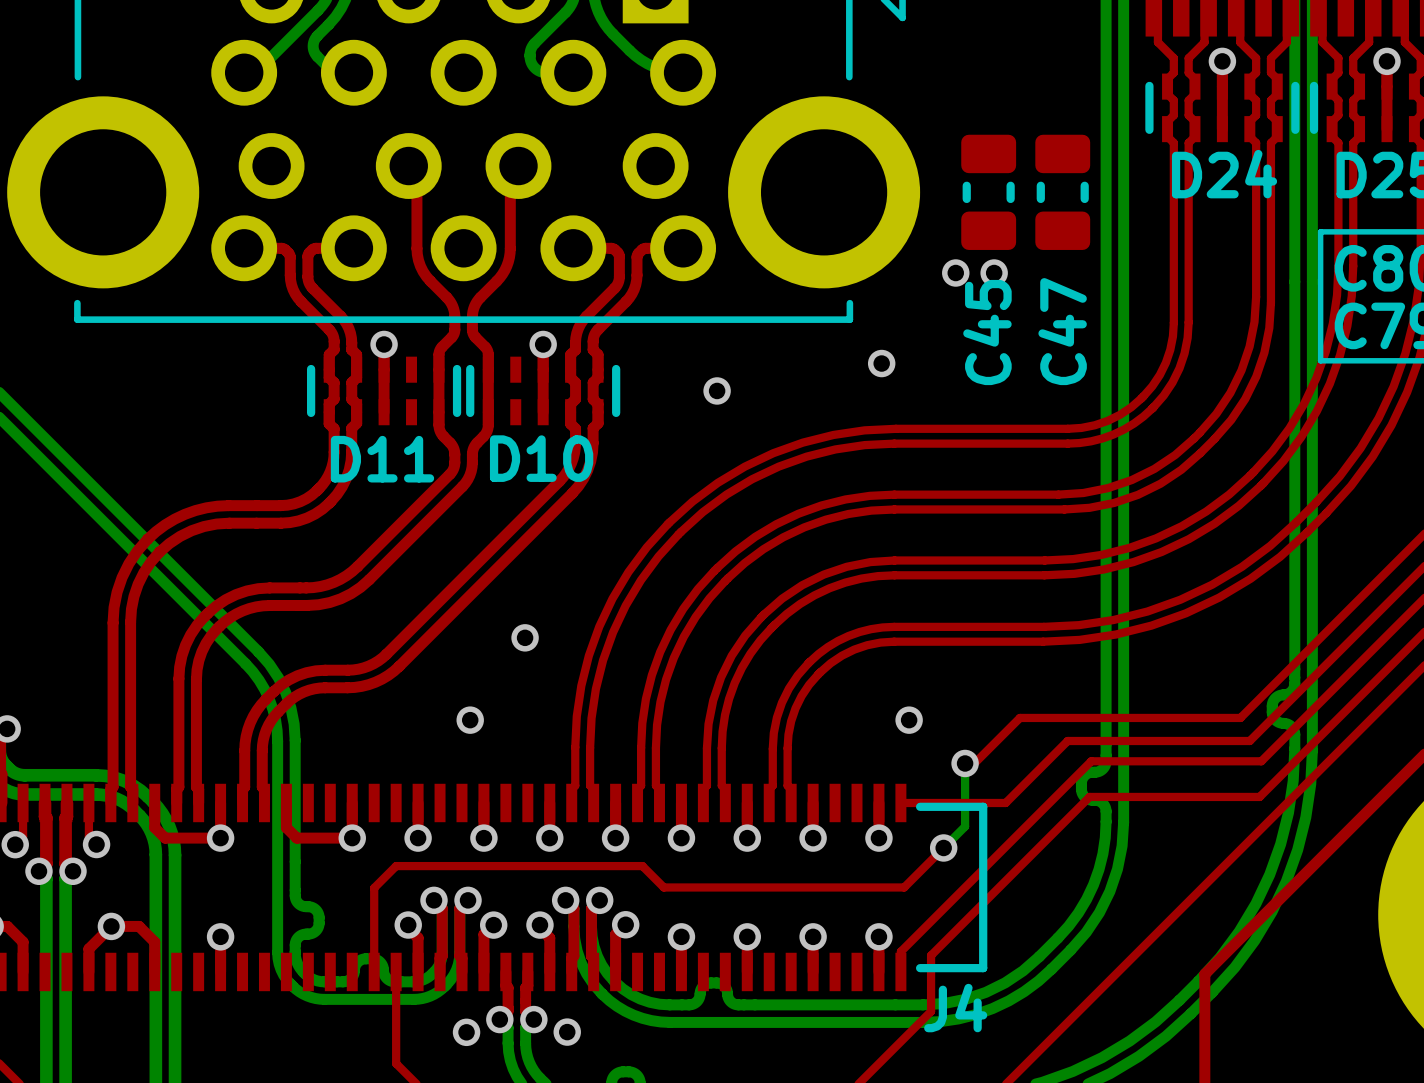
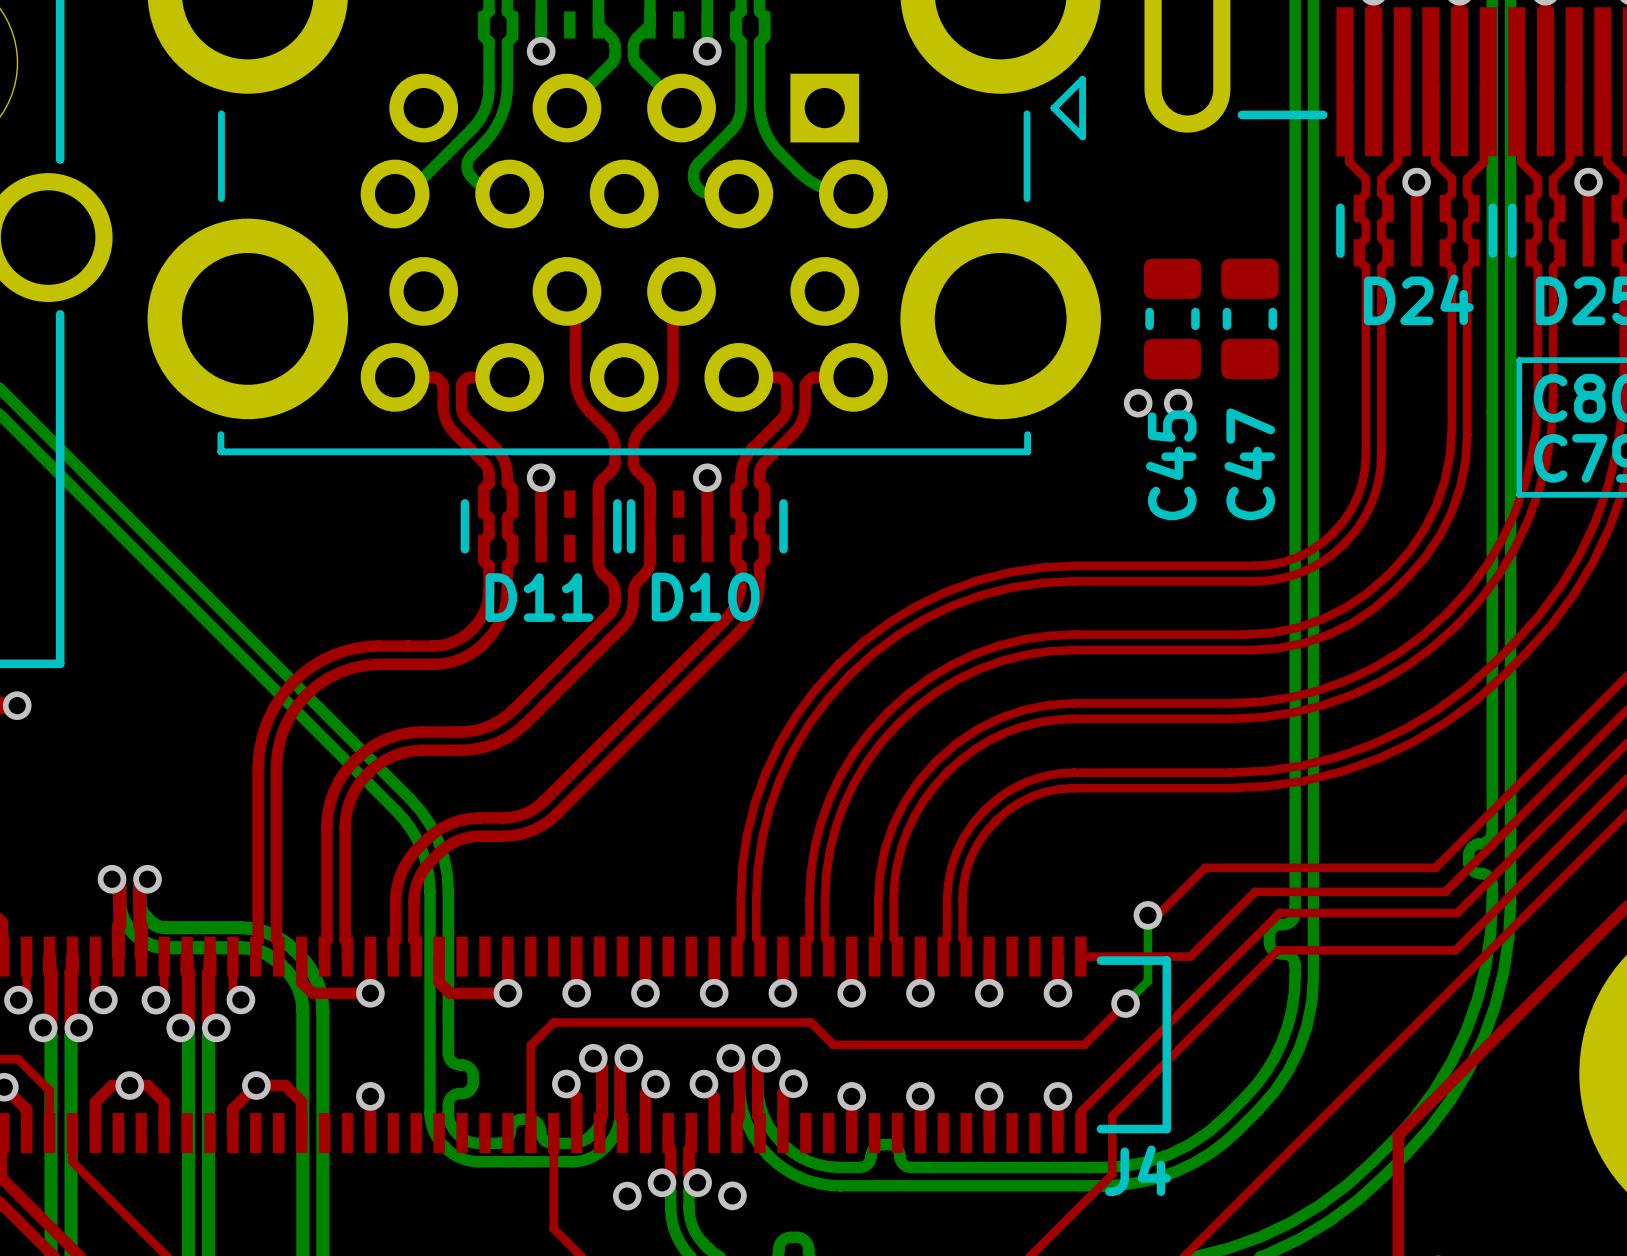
via: (881, 363) -> none
via: (717, 390) -> none
via: (525, 637) -> none
via: (470, 720) -> none
via: (909, 720) -> none

